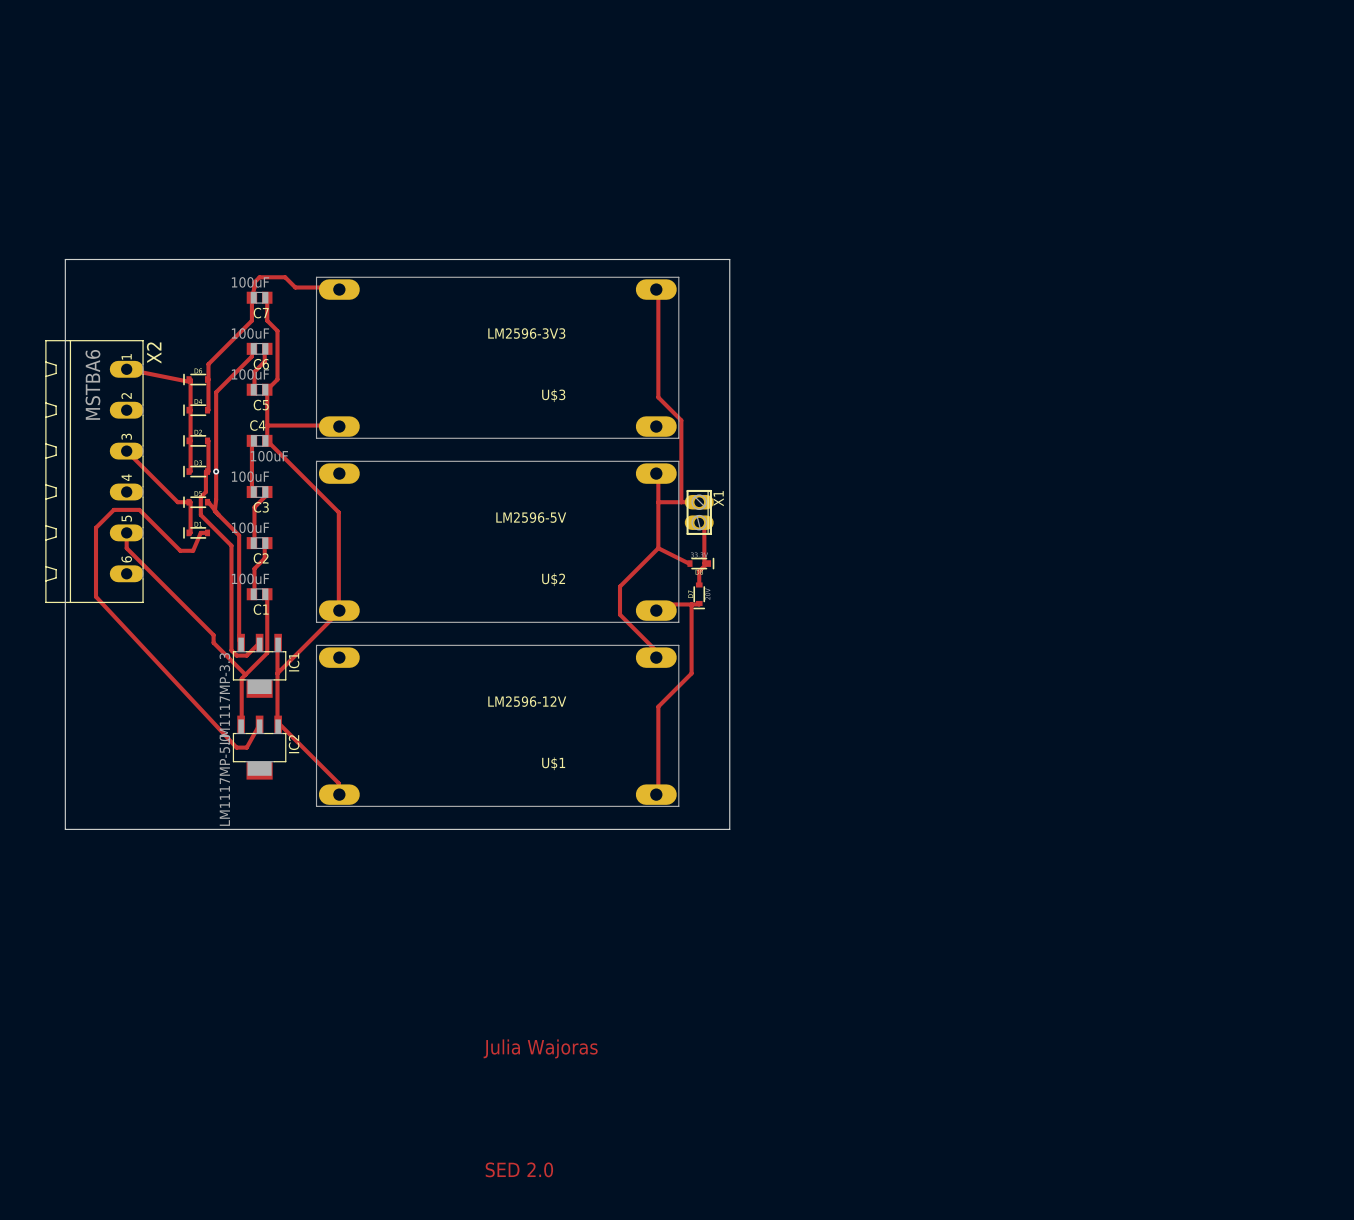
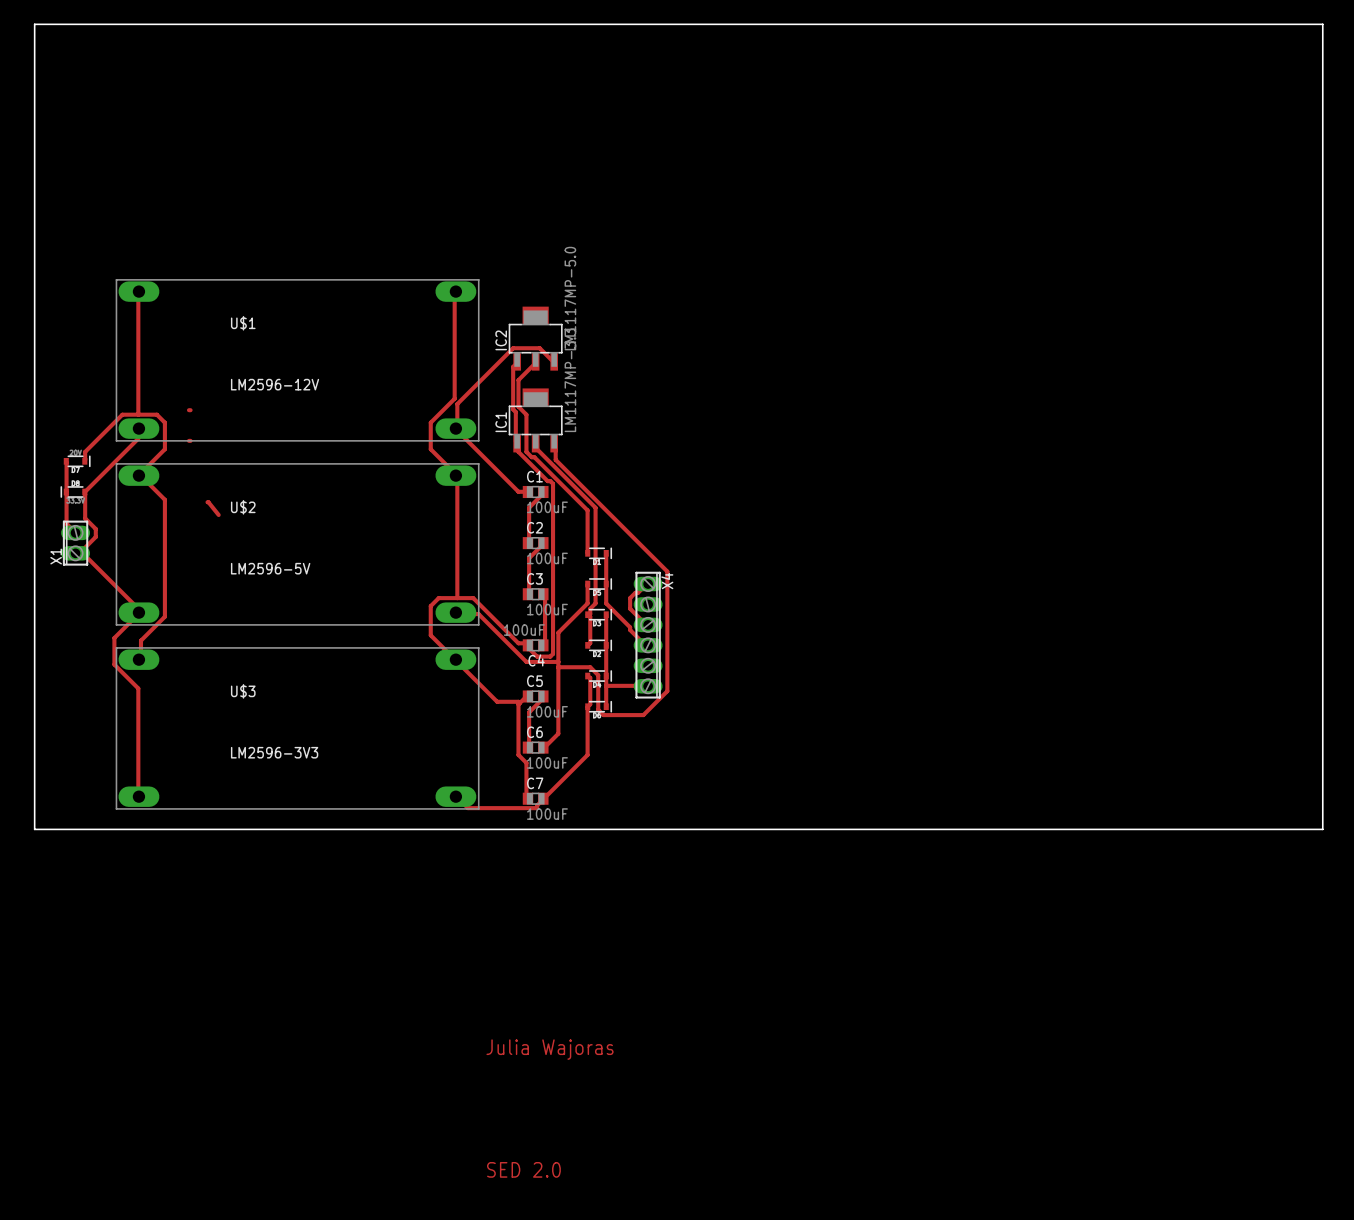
C7 value position: 100uF (250, 282) -> 100uF (547, 814)
track: (339, 289) (338, 287) (295, 287) (285, 277) (259, 277) (254, 282) (251, 297) (251, 320) (208, 364) (207, 410) -> none
track: (656, 289) (658, 290) (658, 397) (681, 420) (681, 502) -> none
track: none -> (138, 291) (138, 414)
track: none -> (455, 291) (454, 398) (430, 422) (430, 449) (457, 475) (457, 598)
C7 position: (259, 297) -> (535, 798)
track: (267, 297) (267, 320) (277, 330) (277, 379) (267, 389) (267, 440) (338, 512) (338, 612) (277, 673) -> none
C7 name position: C7 (261, 313) -> C7 (535, 783)
C6 value position: 100uF (250, 333) -> 100uF (547, 762)
track: (251, 348) (251, 356) (216, 392) (214, 511) (239, 535) (239, 640) (241, 642) -> none
C6 position: (259, 348) -> (535, 747)
track: (267, 348) (264, 348) (264, 361) (254, 371) (254, 389) (251, 389) -> none
U$3 rotation: 0° (497, 357) -> 180° (297, 728)
U$3 position: (497, 357) -> (297, 728)
track: none -> (517, 361) (513, 366) (513, 409) (515, 412) (515, 441) (518, 443) (518, 451) (547, 481) (553, 483) (553, 653) (550, 656) (537, 656) (526, 645) (528, 645) (526, 643) (518, 643) (473, 598) (438, 598) (430, 606) (430, 635) (497, 701) (519, 703)
track: none -> (535, 361) (518, 380) (518, 406) (526, 414) (526, 451) (534, 457) (587, 510) (587, 553)
track: none -> (554, 361) (539, 348) (513, 348) (457, 404) (457, 430) (518, 491) (528, 491)
C6 name position: C6 (261, 364) -> C6 (534, 732)
track: (126, 369) (190, 382) -> none
C5 value position: 100uF (250, 374) -> 100uF (547, 711)
track: (188, 379) (190, 379) (190, 471) (188, 471) -> none
part rotation: 0° (196, 379) -> 180° (598, 706)
part position: (196, 379) -> (598, 706)
C5 position: (259, 389) -> (535, 696)
C5 name position: C5 (261, 405) -> C5 (534, 681)
part rotation: 0° (196, 410) -> 180° (598, 676)
part position: (196, 410) -> (598, 676)
C4 name position: C4 (257, 425) -> C4 (536, 660)
track: (267, 425) (339, 426) -> none
track: none -> (138, 428) (138, 438) (84, 491) (85, 518) (95, 529) (95, 536) (77, 555) (75, 553) (82, 552) (140, 611) (114, 638) (114, 664) (138, 688) (138, 796)
part rotation: 0° (196, 440) -> 180° (598, 645)
part position: (196, 440) -> (598, 645)
track: (207, 440) (208, 471) (205, 471) (205, 491) (200, 497) (200, 515) (231, 545) (231, 650) (236, 655) (246, 655) (259, 642) -> none
track: (251, 440) (251, 491) -> none
C4 position: (259, 440) -> (535, 645)
track: none -> (535, 443) (537, 449) (595, 507) (595, 603) (590, 608) (590, 614) (587, 614) (590, 616) (590, 643) (587, 645)
track: none -> (554, 443) (555, 443) (555, 459) (667, 571) (667, 691) (643, 715) (603, 715) (598, 709) (598, 675) (590, 667) (558, 667)
track: (126, 451) (177, 502) (190, 502) (190, 532) (188, 532) -> none
C4 value position: 100uF (269, 456) -> 100uF (524, 630)
track: none -> (66, 461) (66, 523) (75, 532)
track: none -> (84, 461) (85, 451) (122, 414) (156, 414) (164, 422) (164, 449) (138, 475) (164, 499) (164, 616) (140, 640) (140, 659) (138, 659)
X2: MSTBA6 (94, 471) -> none
part rotation: 0° (196, 471) -> 180° (598, 614)
part position: (196, 471) -> (598, 614)
via: (216, 471) -> none
track: (656, 473) (658, 474) (658, 548) -> none
C3 value position: 100uF (250, 476) -> 100uF (547, 609)
C3 position: (259, 491) -> (535, 594)
track: (267, 491) (264, 491) (264, 497) (254, 507) (254, 543) (251, 543) -> none
track: none -> (543, 491) (529, 507) (528, 543)
part rotation: 0° (196, 502) -> 180° (598, 584)
part position: (196, 502) -> (598, 584)
track: (658, 502) (699, 502) -> none
C3 name position: C3 (261, 507) -> C3 (534, 578)
X1 rotation: 0° (699, 512) -> 180° (75, 543)
X1 position: (699, 512) -> (75, 543)
track: (699, 522) (704, 527) (705, 564) -> none
C2 value position: 100uF (250, 527) -> 100uF (547, 558)
track: (126, 532) (126, 548) (213, 635) (213, 642) (245, 674) -> none
part rotation: 0° (196, 532) -> 180° (598, 553)
part position: (196, 532) -> (598, 553)
track: (207, 532) (200, 532) (193, 550) (180, 550) (139, 509) (113, 509) (96, 527) (96, 596) (236, 747) (246, 747) (259, 724) -> none
U$2 rotation: 0° (497, 541) -> 180° (297, 544)
C2 position: (259, 543) -> (535, 543)
track: (267, 543) (264, 543) (264, 558) (254, 568) (254, 594) (251, 594) -> none
track: none -> (543, 543) (529, 558) (528, 594)
track: (658, 548) (689, 563) -> none
track: (658, 548) (620, 586) (620, 614) (655, 650) (656, 657) -> none
track: none -> (606, 553) (606, 603) (646, 645) (648, 645)
C2 name position: C2 (261, 558) -> C2 (534, 527)
part rotation: 0° (700, 563) -> 180° (73, 491)
part position: (700, 563) -> (73, 491)
track: (708, 563) (699, 571) (699, 584) -> none
C1 value position: 100uF (250, 578) -> 100uF (547, 507)
track: none -> (587, 584) (587, 603) (558, 632) (558, 733) (543, 747)
track: none -> (648, 584) (630, 598) (630, 608) (648, 624)
C1 position: (259, 594) -> (535, 491)
track: (267, 594) (267, 653) (241, 678) (241, 724) -> none
track: none -> (543, 594) (545, 595) (545, 643) (543, 645)
part rotation: 0° (699, 595) -> 90° counterclockwise (77, 461)
part position: (699, 595) -> (77, 461)
track: (699, 603) (663, 604) (656, 610) -> none
track: (691, 604) (691, 673) (658, 706) (658, 793) (656, 794) -> none
C1 name position: C1 (261, 609) -> C1 (534, 476)
track: none -> (455, 612) (478, 614) (526, 661) (558, 661)
track: none -> (606, 614) (606, 706)
X4: none -> (648, 635)
track: (278, 642) (278, 724) (338, 783) (339, 794) -> none
IC1 rotation: 0° (259, 665) -> 180° (535, 420)
IC1 position: (259, 665) -> (535, 420)
track: none -> (587, 676) (590, 677) (590, 704) (587, 707) (587, 754) (543, 798) (537, 808) (467, 808) (455, 796)
track: none -> (606, 685) (648, 686)
track: none -> (528, 696) (518, 704) (518, 754) (526, 762) (528, 798)
track: none -> (543, 696) (545, 696) (529, 712) (528, 747)
U$1 rotation: 0° (497, 725) -> 180° (297, 360)
U$1 position: (497, 725) -> (297, 360)
IC2 rotation: 0° (259, 747) -> 180° (535, 338)
IC2 position: (259, 747) -> (535, 338)
board edge: (65, 829) (65, 259) (729, 259) (729, 829) -> (65, 829) (34, 829) (34, 24) (1322, 24) (1322, 829) (729, 829)

